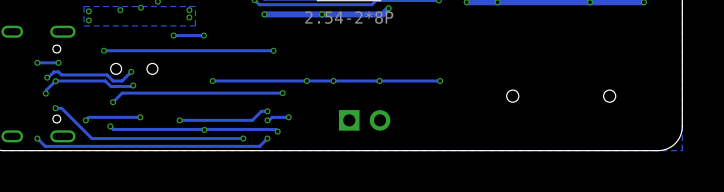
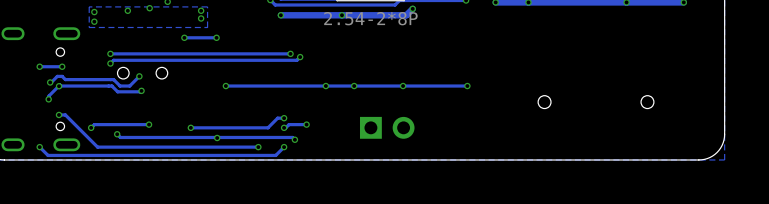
track: none -> (300, 57) (296, 60) (113, 60) (110, 63)
track: (282, 93) (122, 93) (113, 102) -> none
via position: (282, 93) -> (300, 57)
via position: (113, 102) -> (110, 63)

